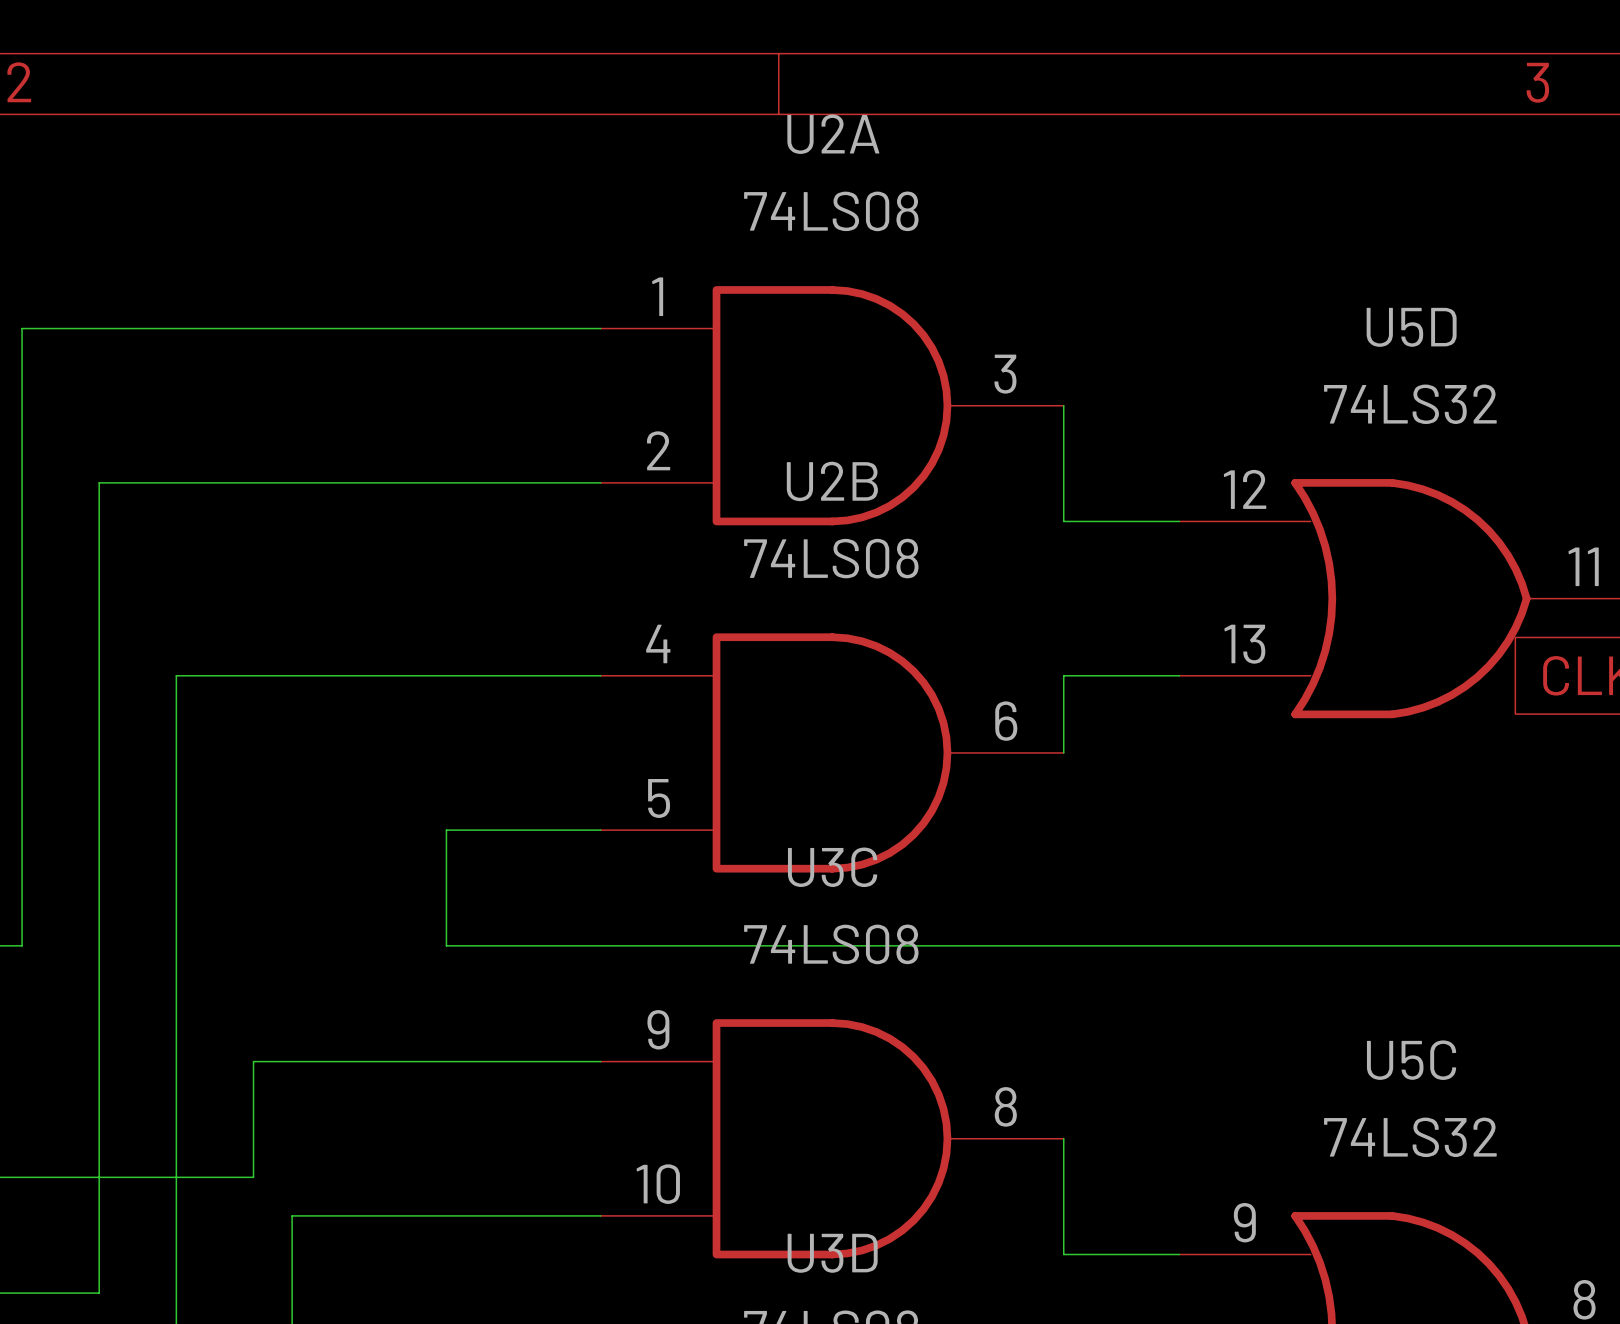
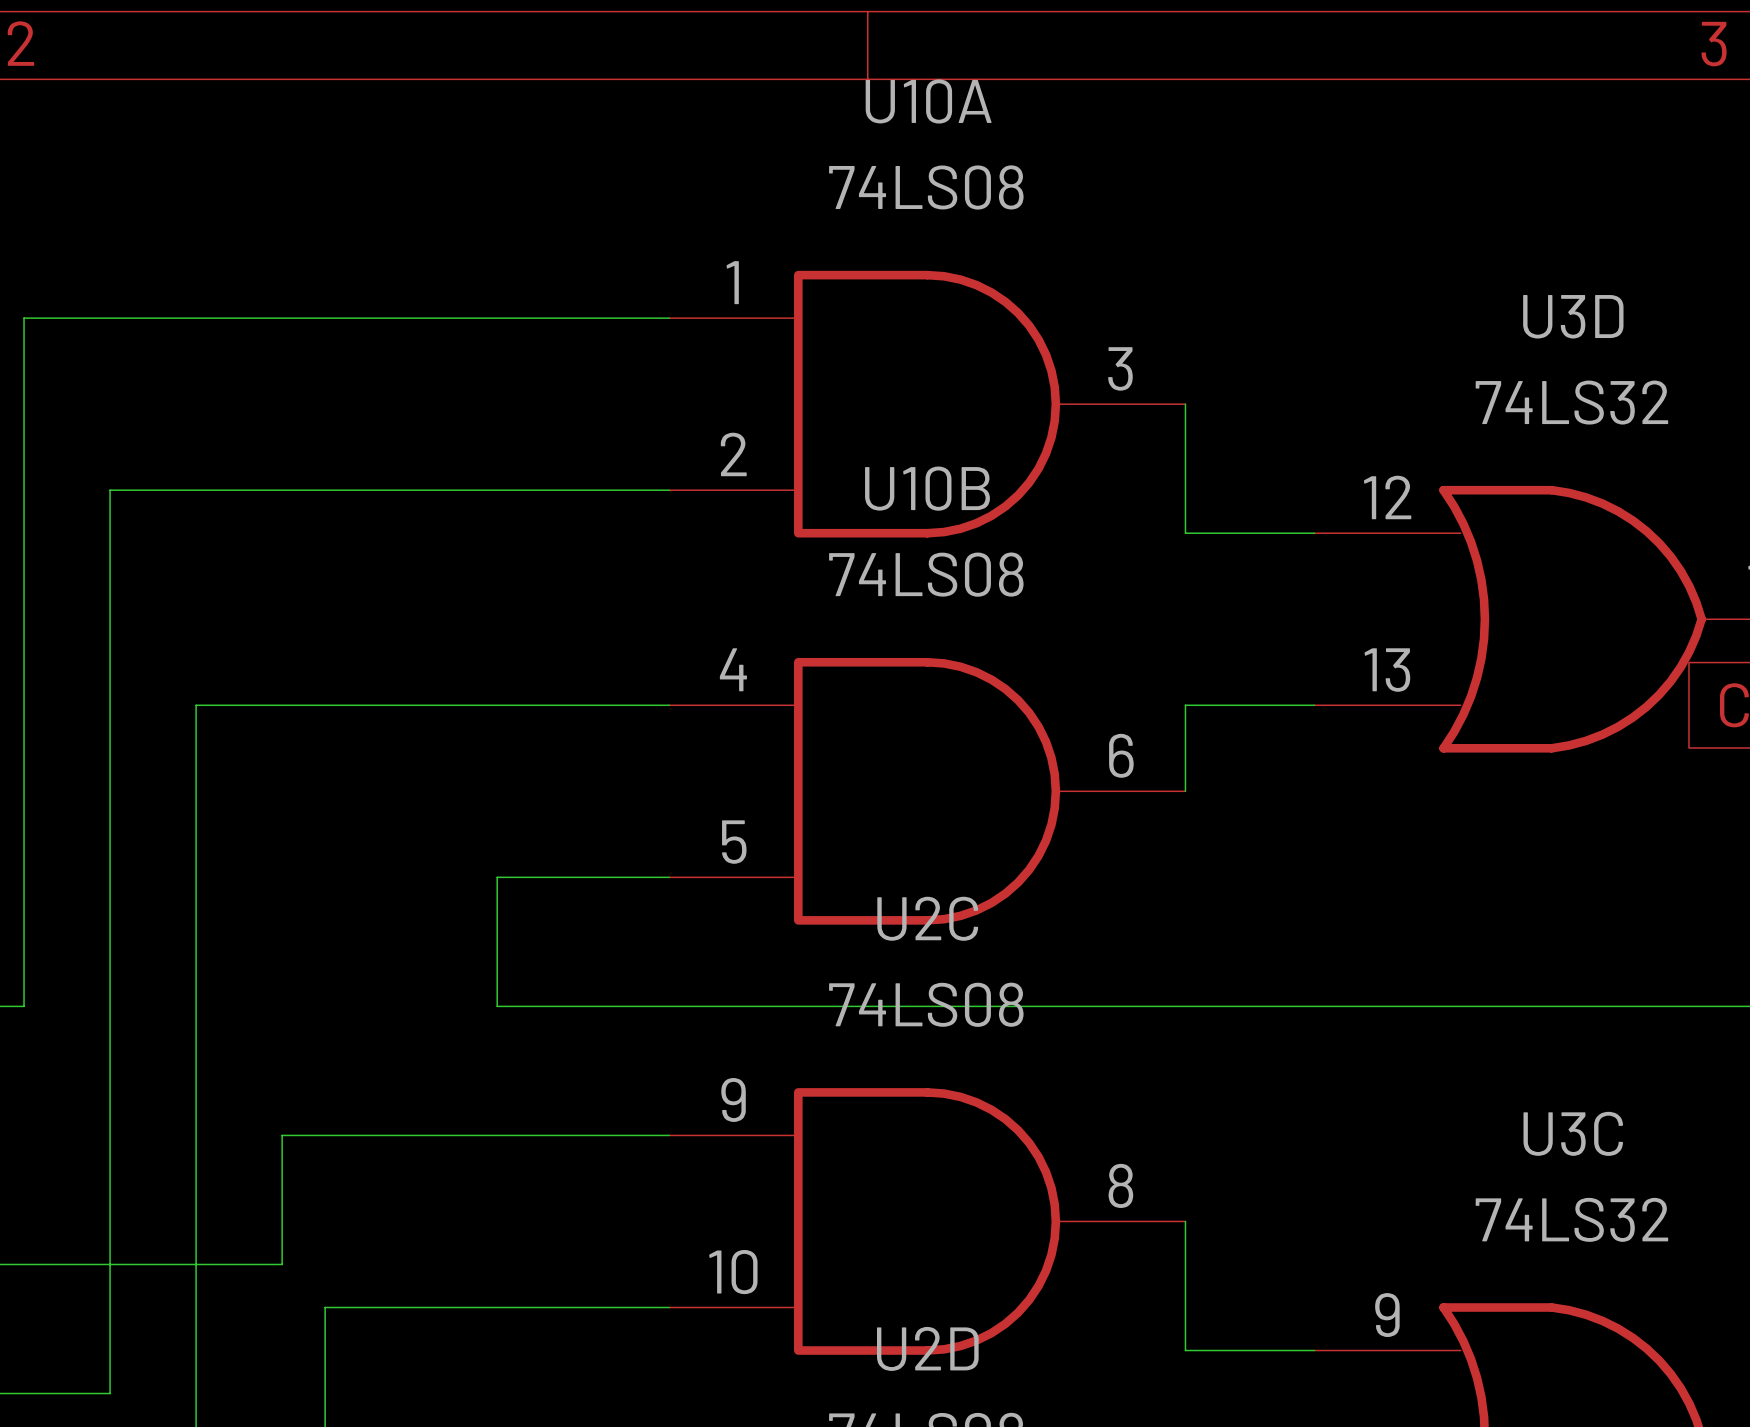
U2A name: U2A (833, 134) -> U10A (928, 101)
U5D name: U5D (1411, 327) -> U3D (1573, 316)
U2B name: U2B (832, 481) -> U10B (927, 488)
U3C name: U3C (832, 867) -> U2C (927, 918)
U5C name: U5C (1411, 1060) -> U3C (1573, 1133)
U3D name: U3D (832, 1253) -> U2D (927, 1348)

